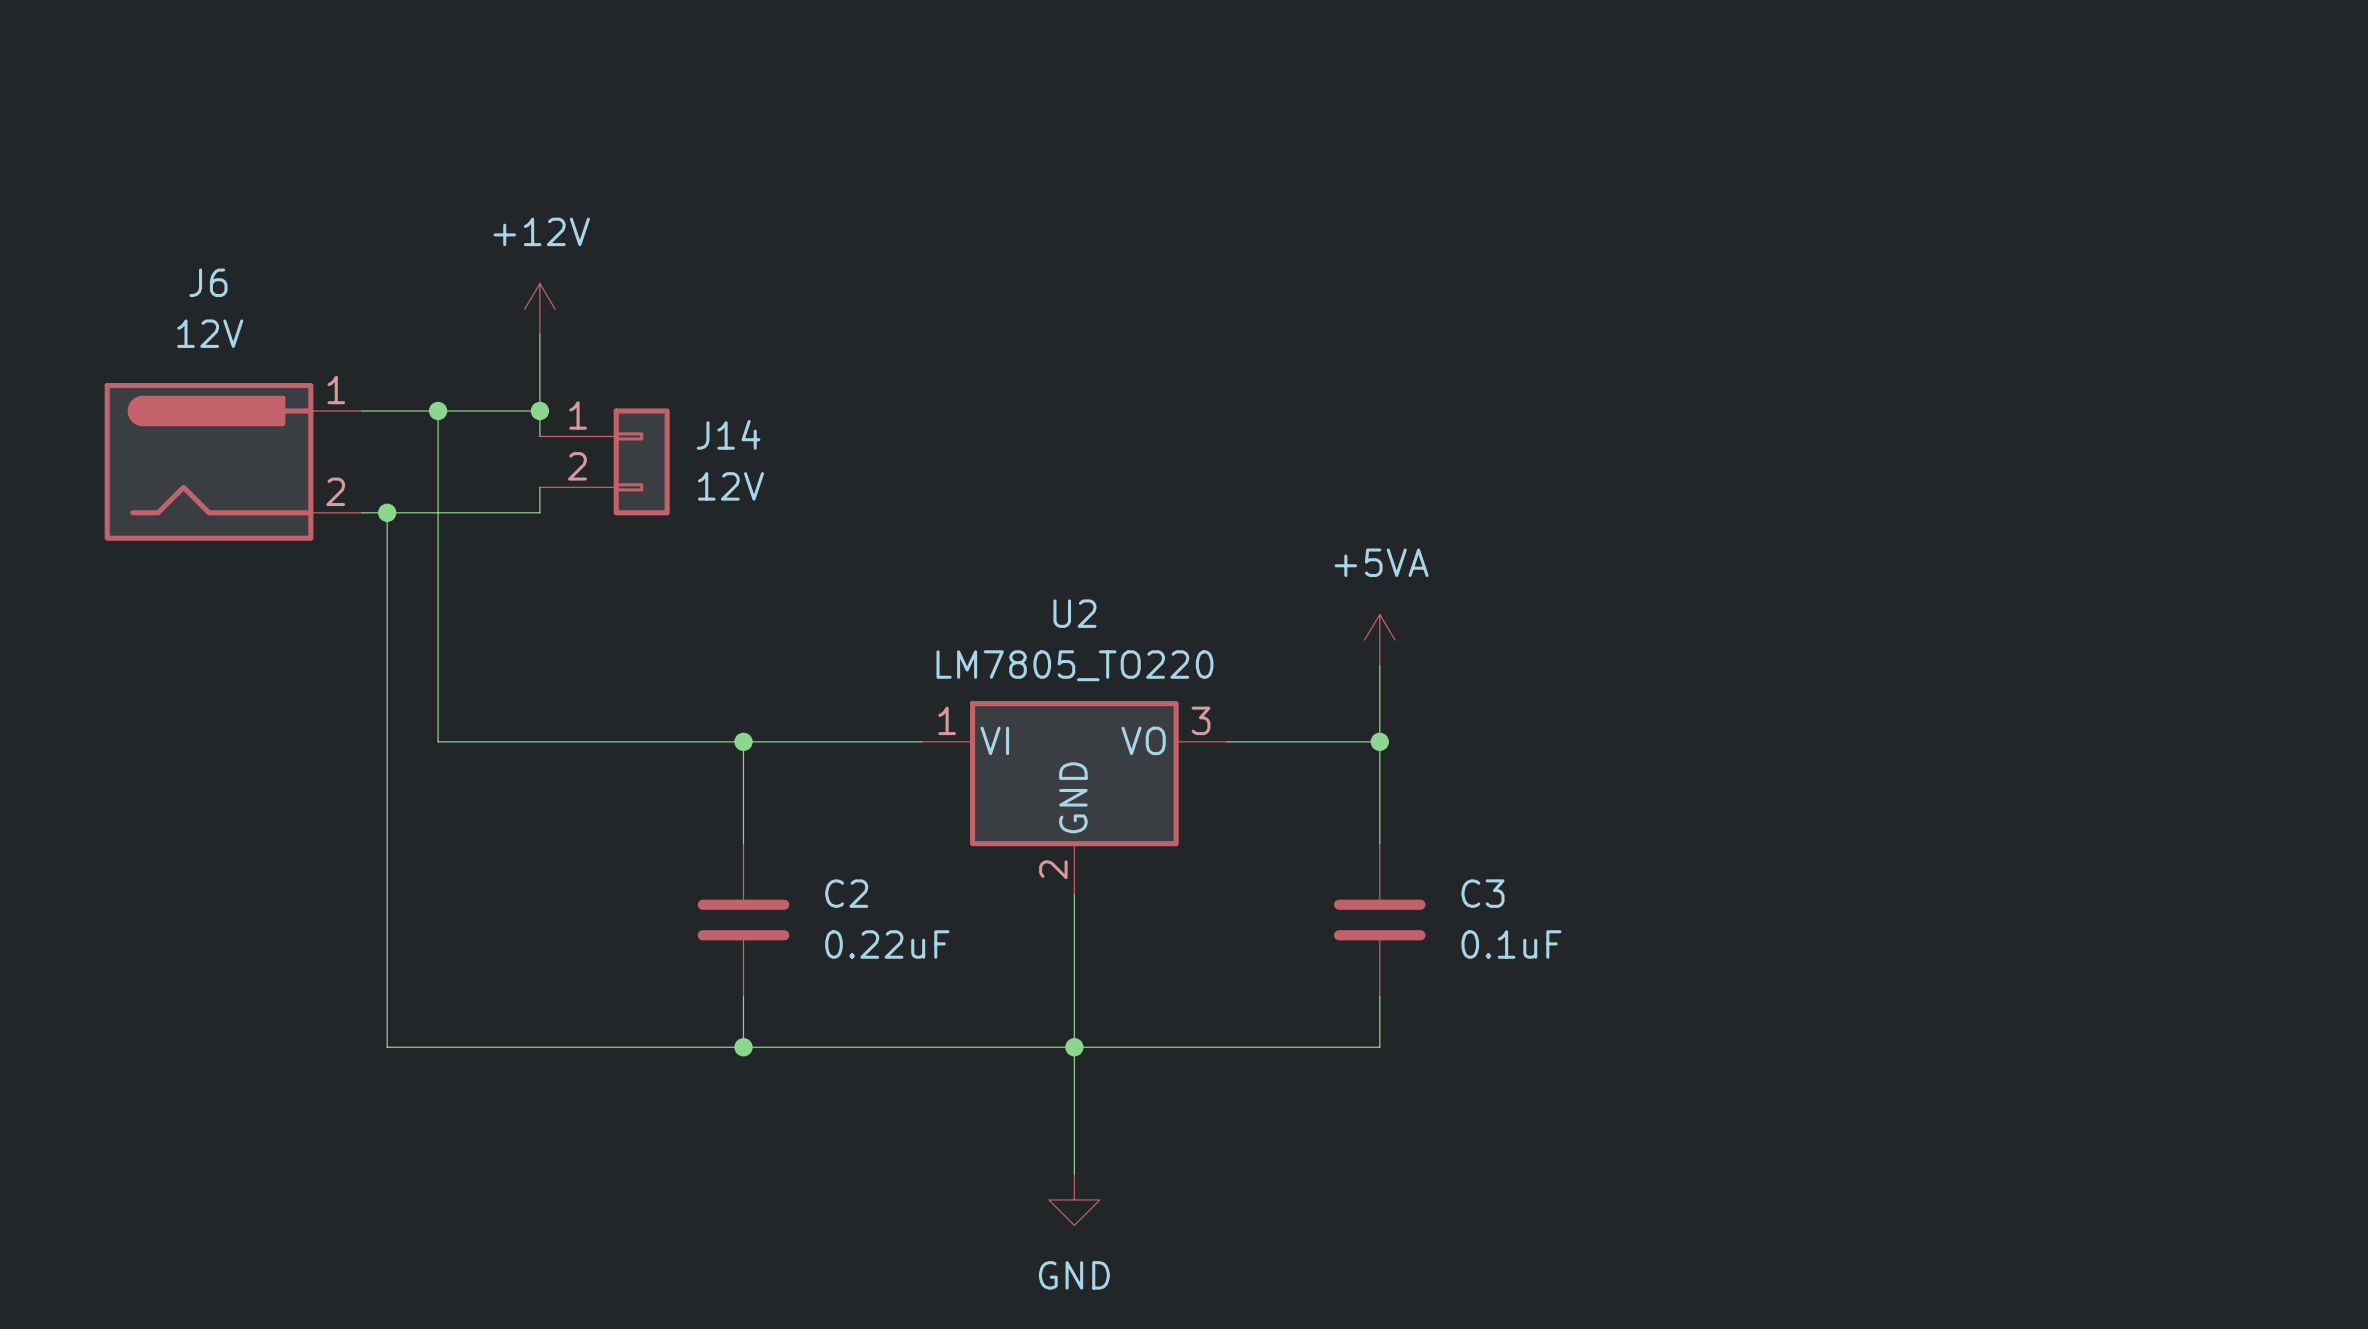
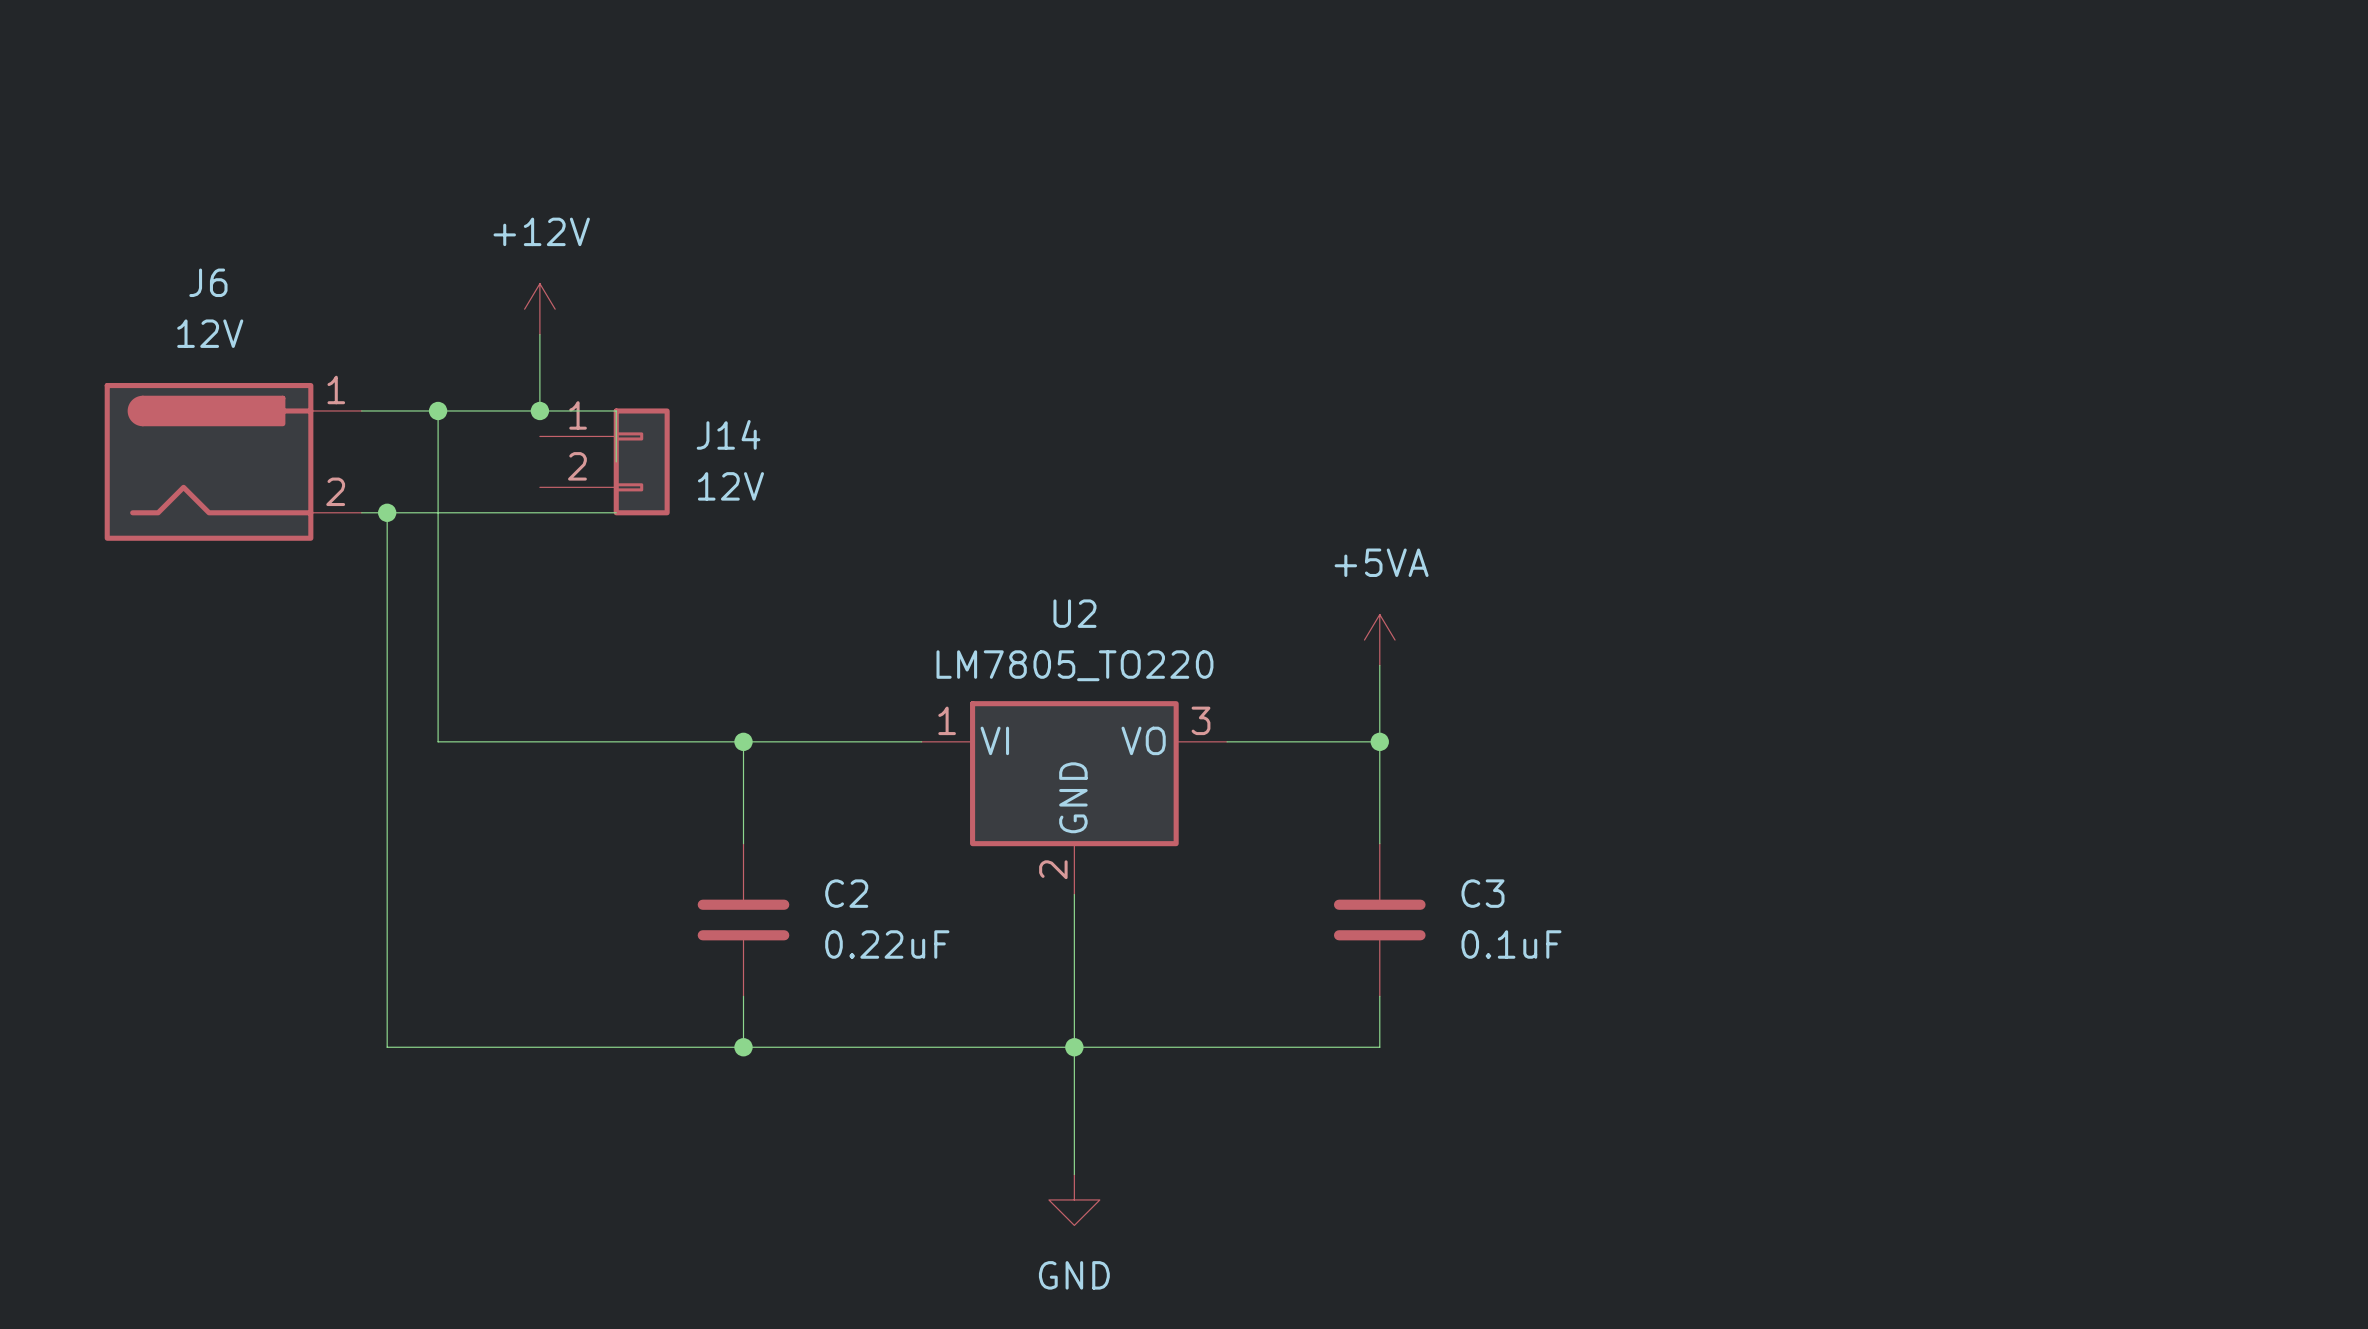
wire: (539, 410) (539, 436) -> (539, 410) (616, 410) (616, 461)
wire: (539, 487) (539, 512) -> (616, 512) (539, 512)

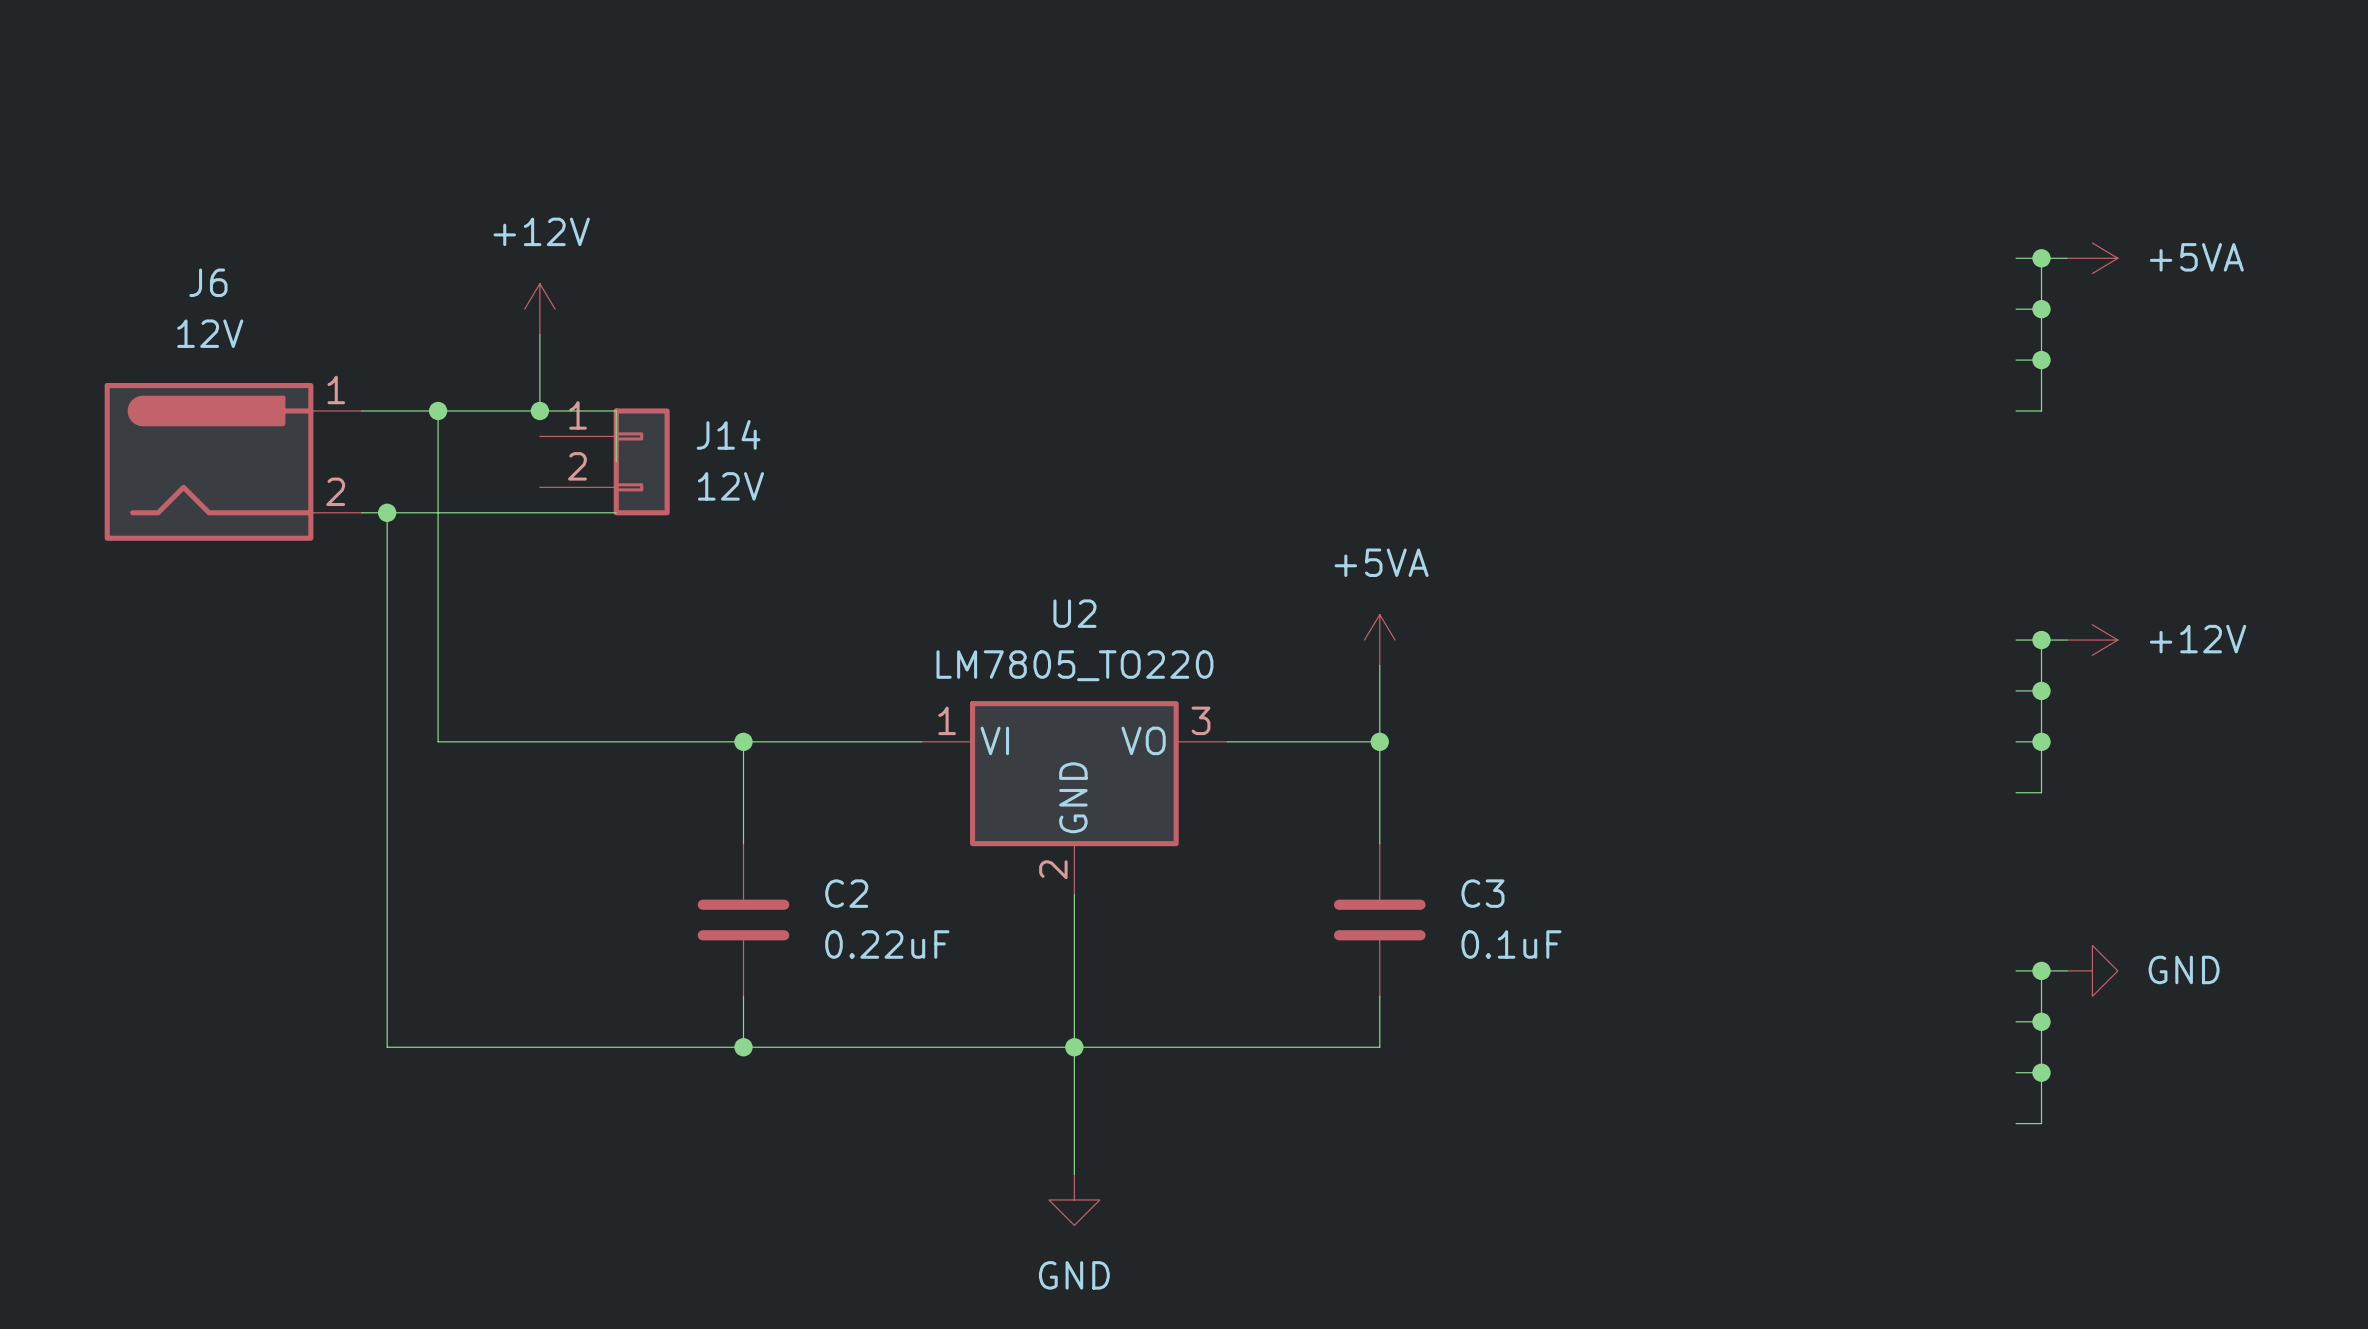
wire: none -> (2016, 258) (2066, 258)
wire: none -> (2041, 258) (2041, 410) (2016, 410)
junction: none -> (2041, 258)
power symbol: none -> +5VA (2092, 258)
wire: none -> (2016, 309) (2041, 309)
junction: none -> (2041, 309)
wire: none -> (2016, 360) (2041, 360)
junction: none -> (2041, 360)
wire: none -> (2016, 640) (2066, 640)
wire: none -> (2041, 640) (2041, 792) (2016, 792)
junction: none -> (2041, 640)
power symbol: none -> +12V (2092, 640)
wire: none -> (2016, 690) (2041, 690)
junction: none -> (2041, 690)
wire: none -> (2016, 741) (2041, 741)
junction: none -> (2041, 741)
wire: none -> (2016, 970) (2066, 970)
wire: none -> (2041, 970) (2041, 1123) (2016, 1123)
junction: none -> (2041, 970)
power symbol: none -> GND (2092, 970)
wire: none -> (2016, 1021) (2041, 1021)
junction: none -> (2041, 1021)
wire: none -> (2016, 1072) (2041, 1072)
junction: none -> (2041, 1072)

